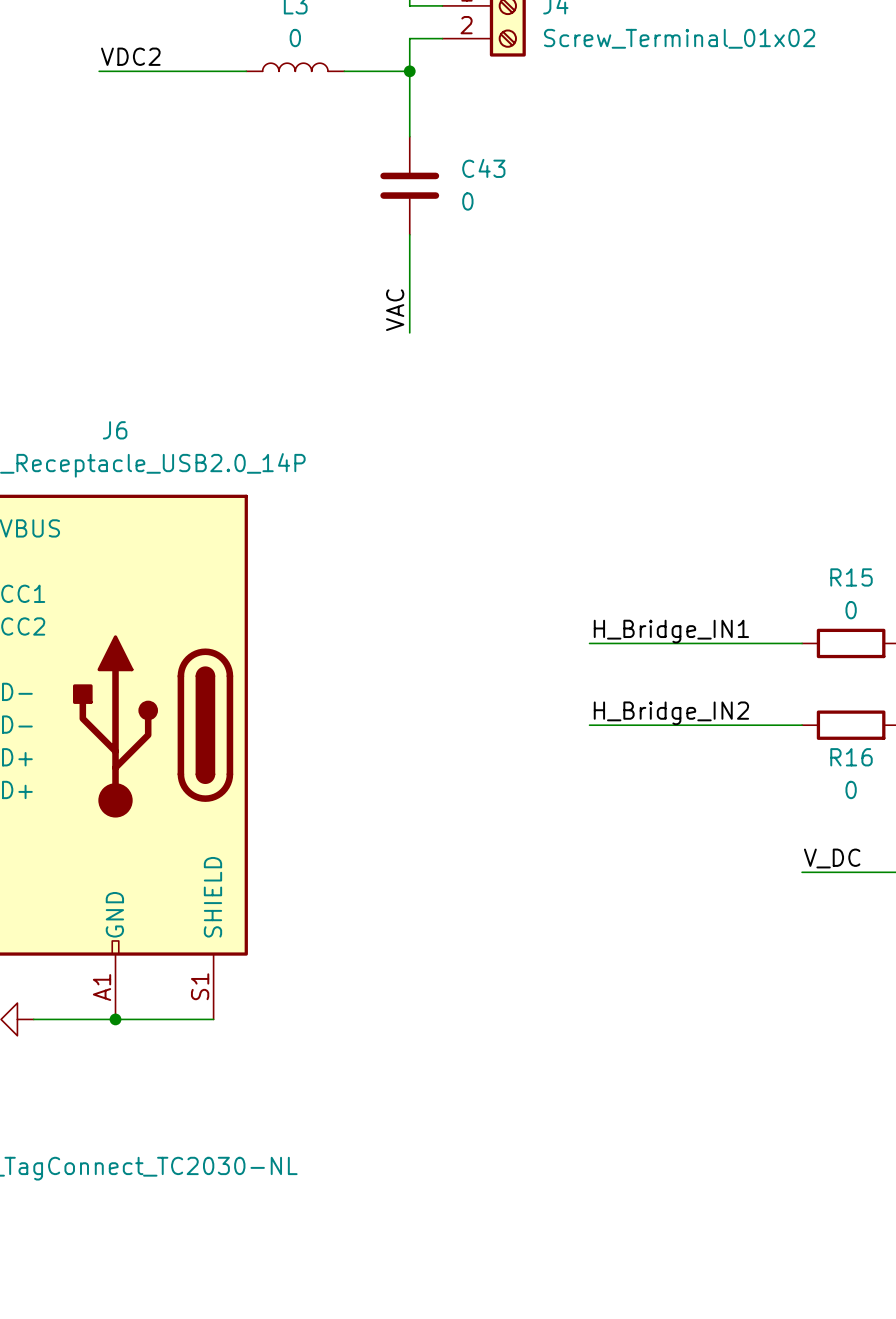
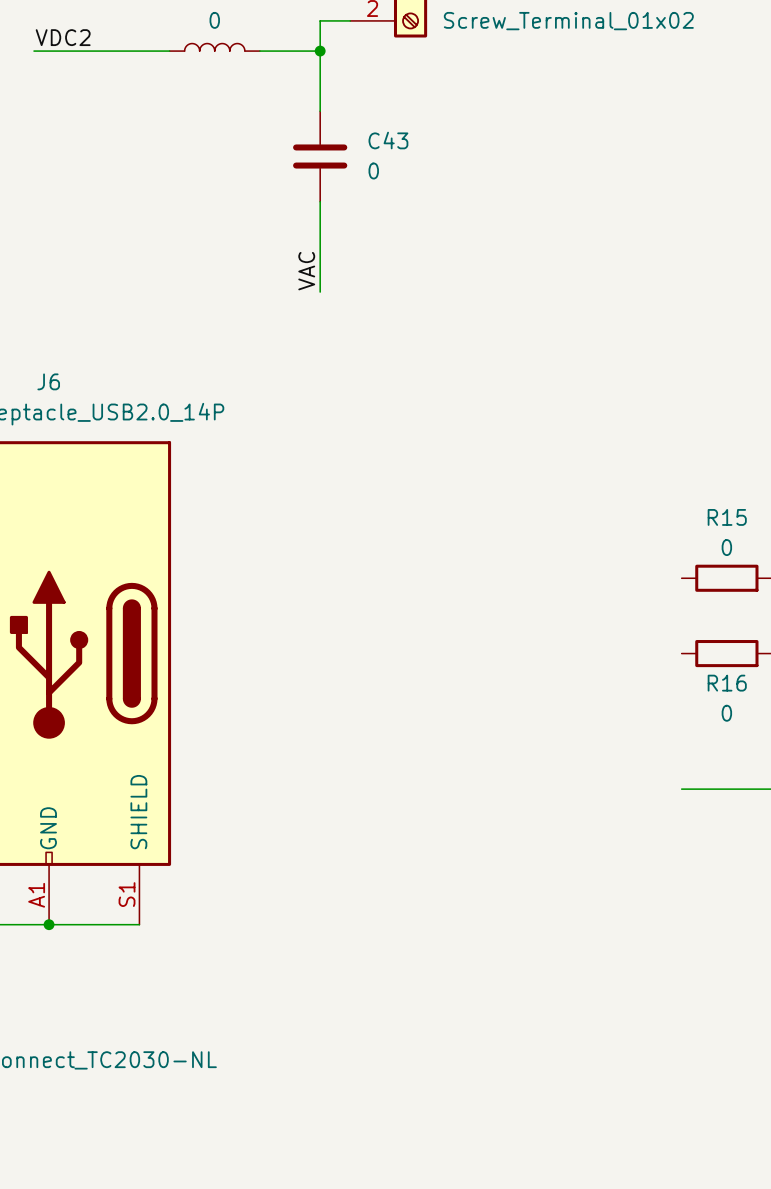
label: H_Bridge_IN1 (671, 631) -> none
wire: (589, 643) (802, 643) -> none
label: H_Bridge_IN2 (671, 713) -> none
wire: (589, 725) (802, 725) -> none
label: V_DC (832, 858) -> none

